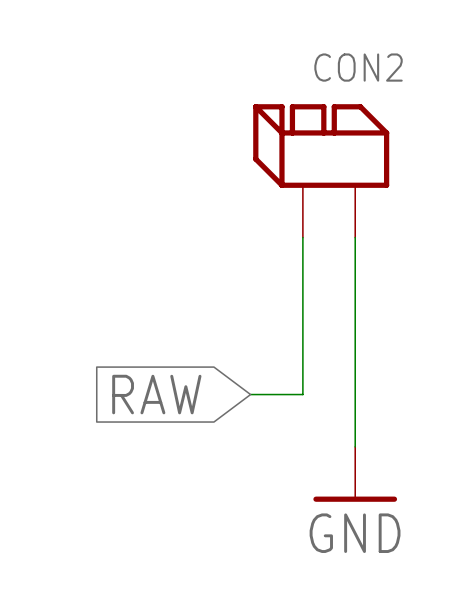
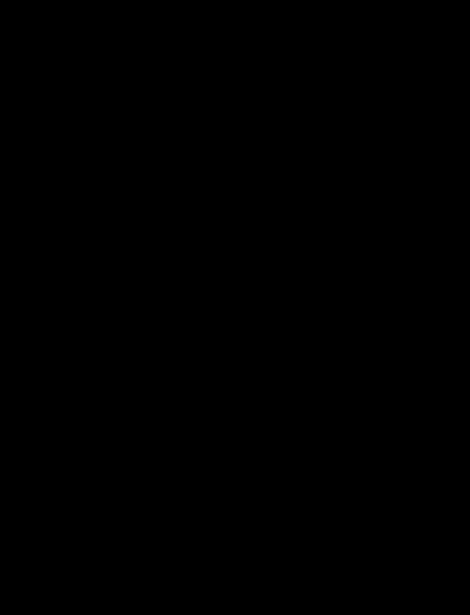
CON2: (321, 170) -> none
wire: (302, 237) (302, 394) (250, 394) -> none
wire: (355, 237) (355, 446) -> none
global label: RAW (156, 394) -> none
power symbol: GND (355, 474) -> none

